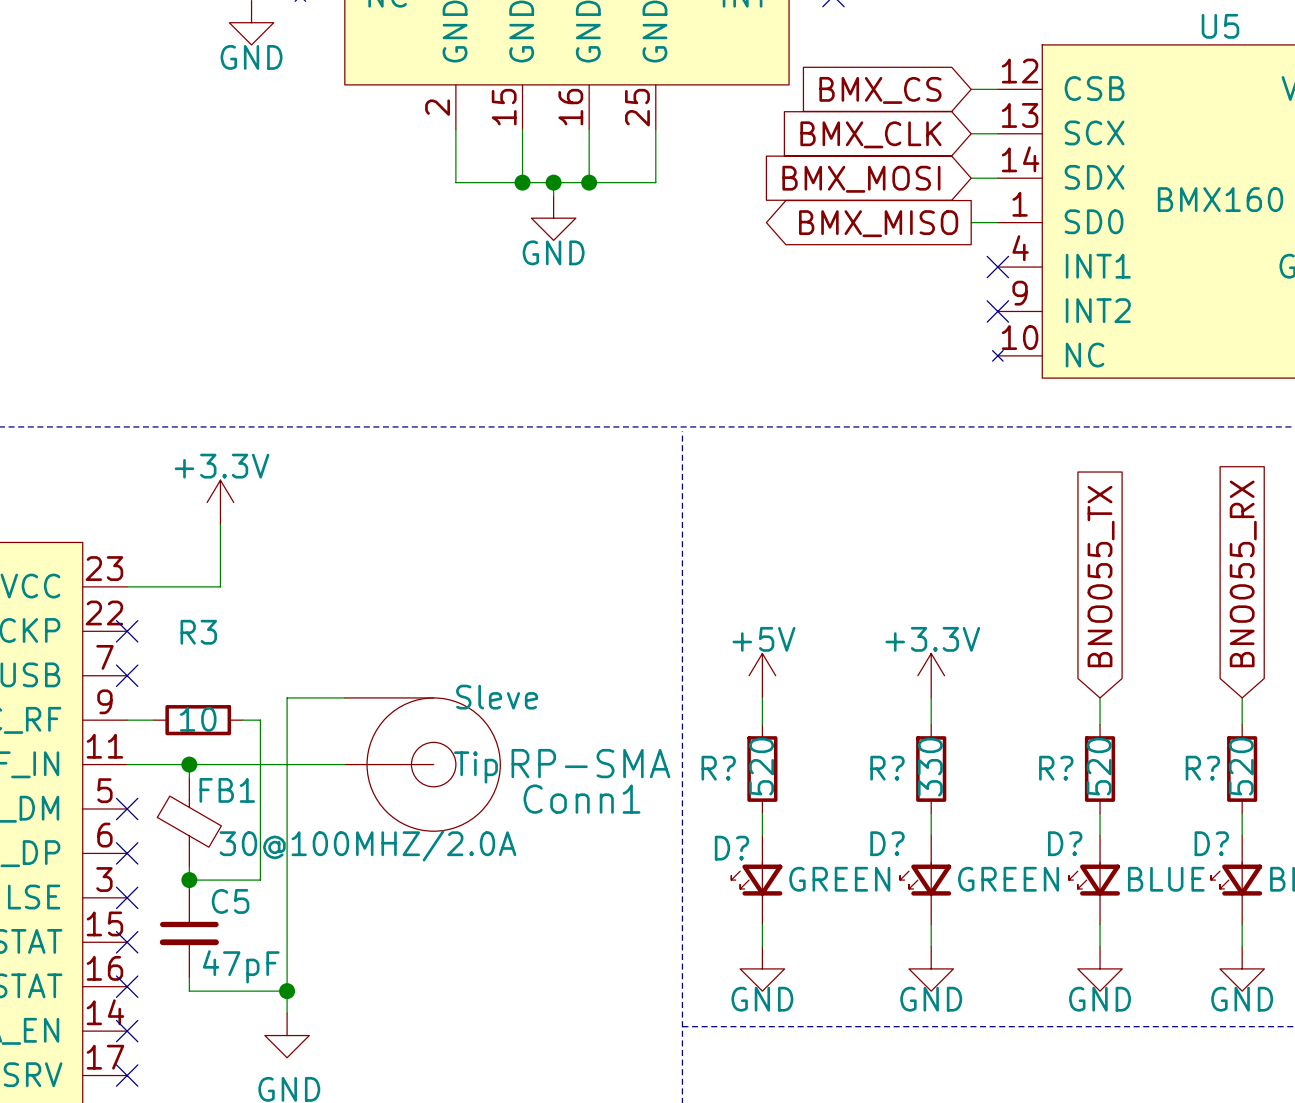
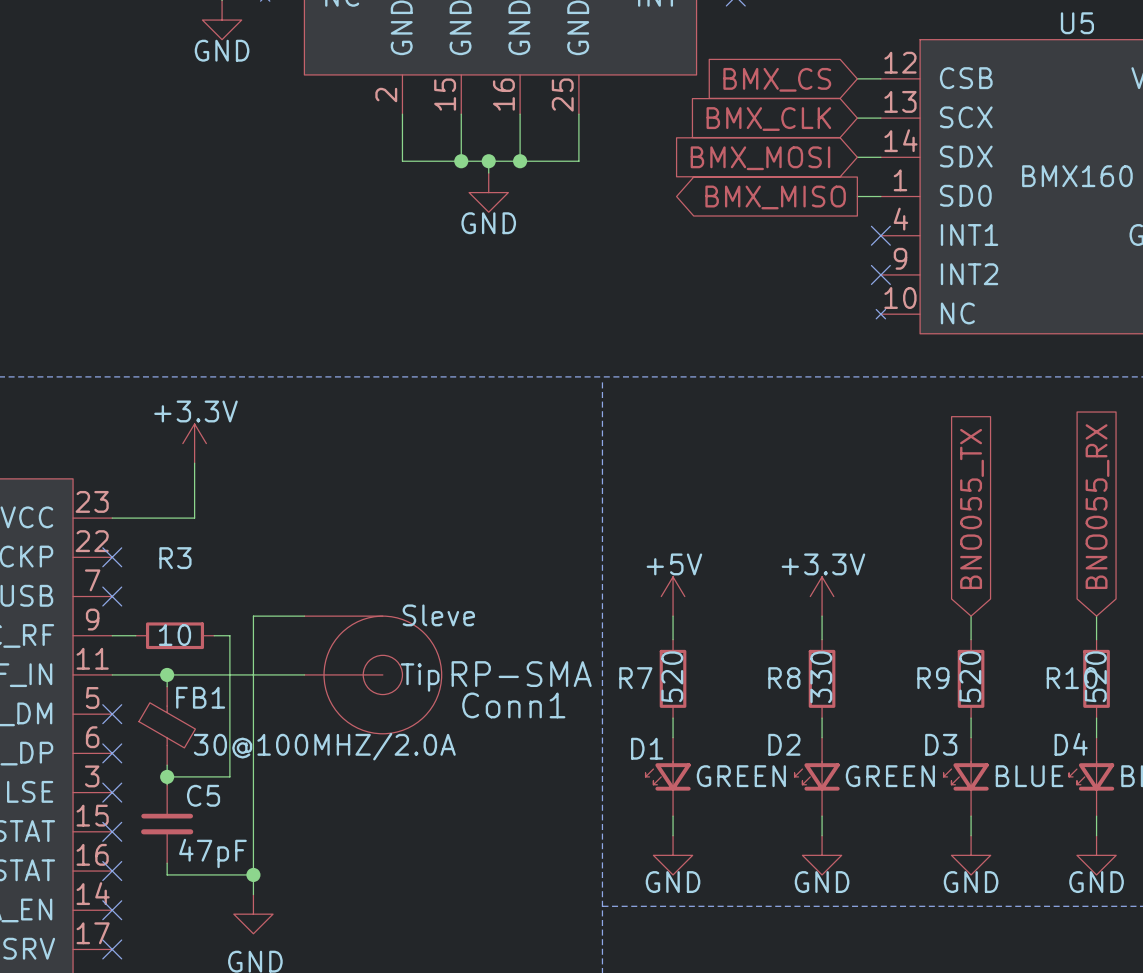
R? name: R? (718, 768) -> R7 (635, 678)
R? name: R? (887, 768) -> R8 (784, 678)
R? name: R? (1056, 768) -> R9 (933, 678)
R? name: R? (1202, 768) -> R10 (1072, 678)
D? name: D? (887, 843) -> D2 (784, 744)
D? name: D? (1065, 843) -> D3 (941, 744)
D? name: D? (1211, 843) -> D4 (1071, 744)
D? name: D? (732, 848) -> D1 (647, 748)

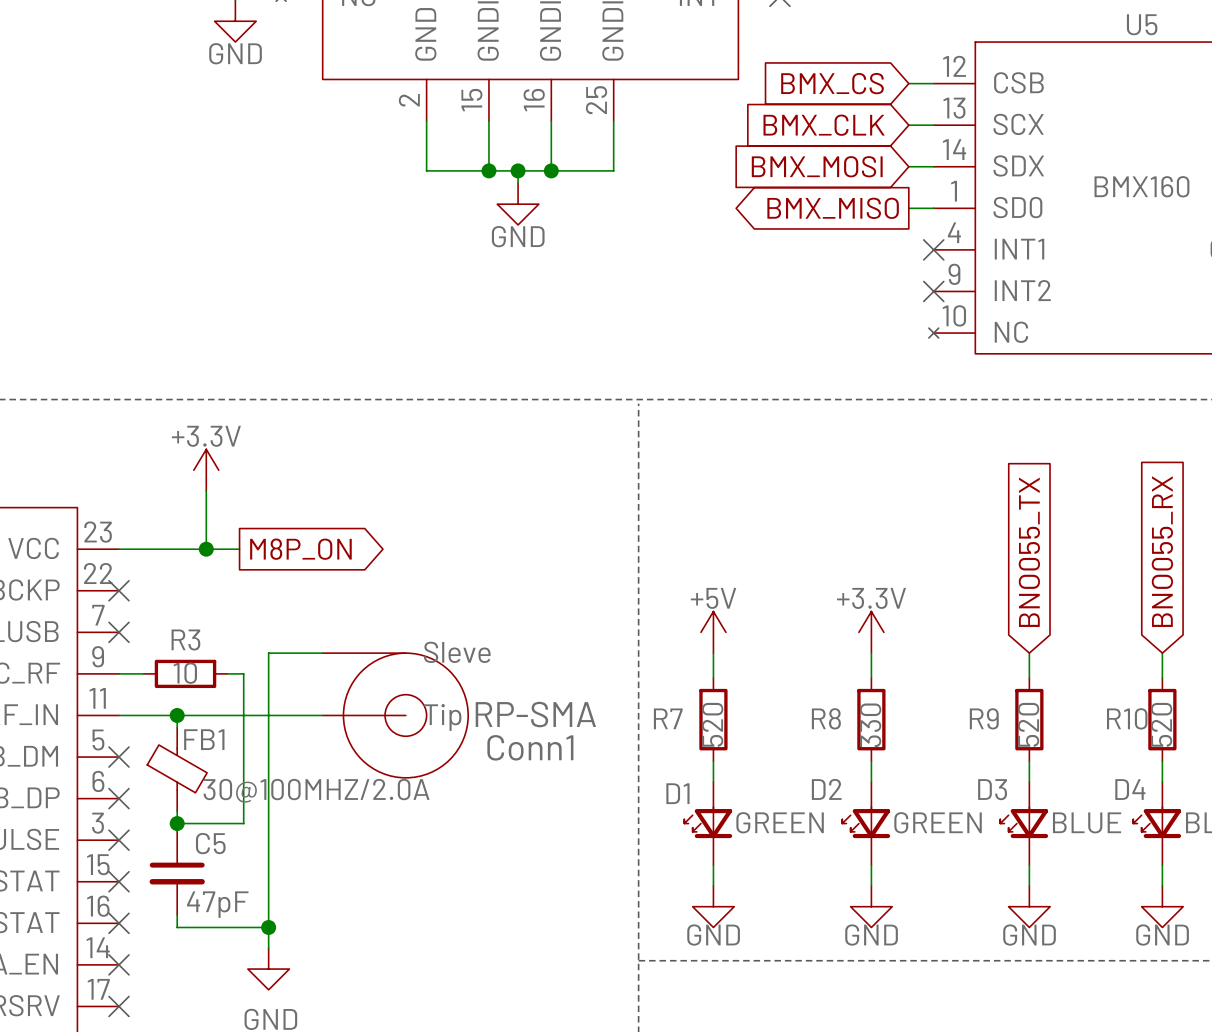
wire: none -> (206, 549) (239, 549)
junction: none -> (206, 549)
global label: none -> M8P_ON (300, 549)
R3 name position: R3 (175, 558) -> R3 (185, 639)

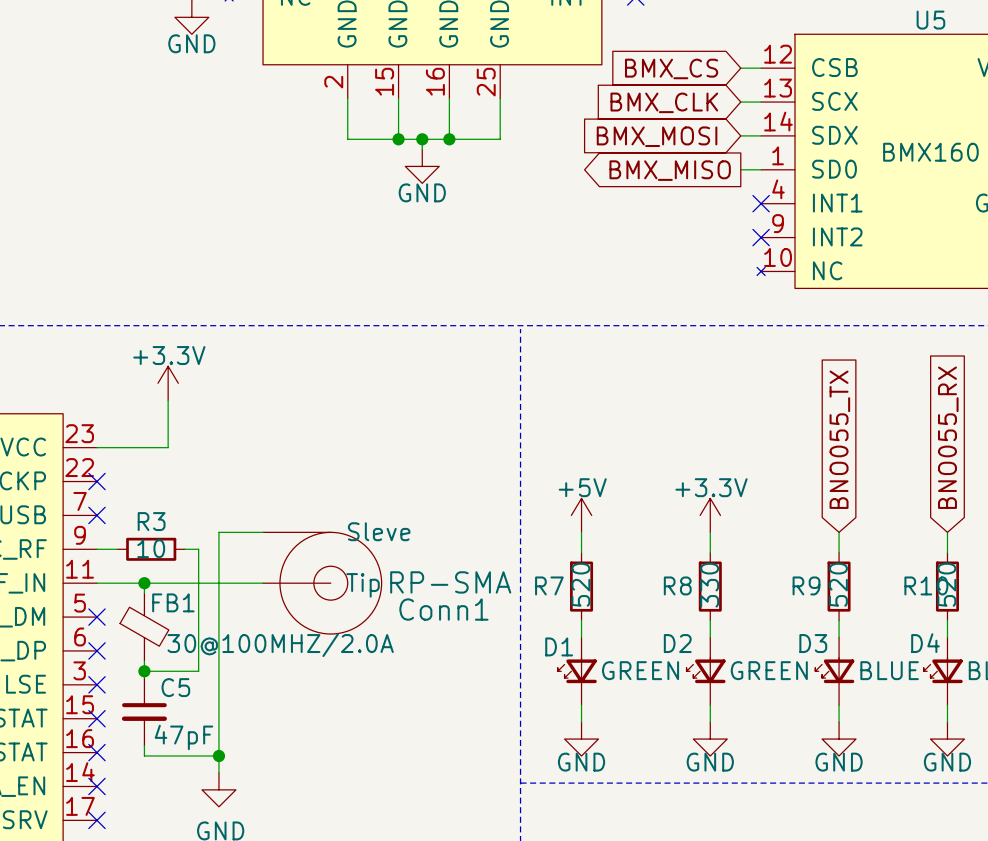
wire: (206, 549) (239, 549) -> none
junction: (206, 549) -> none
global label: M8P_ON (300, 549) -> none

